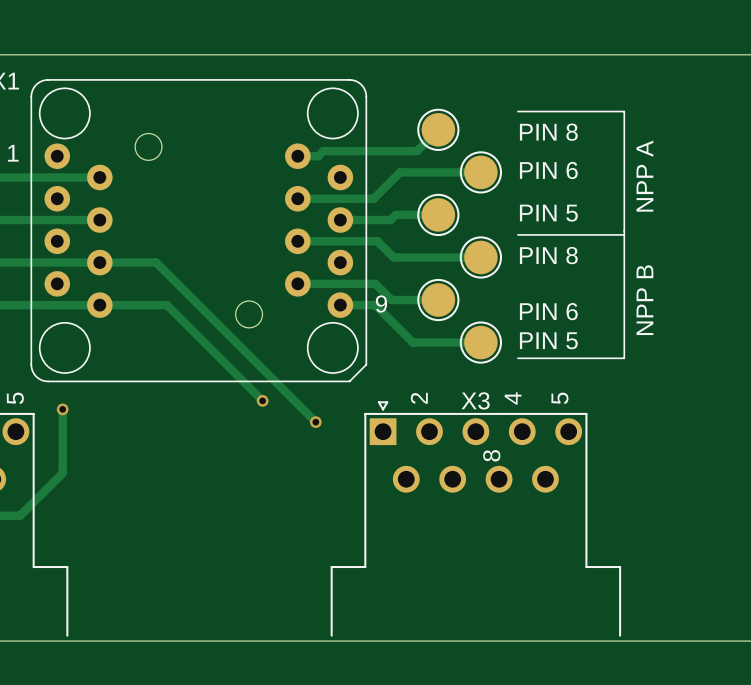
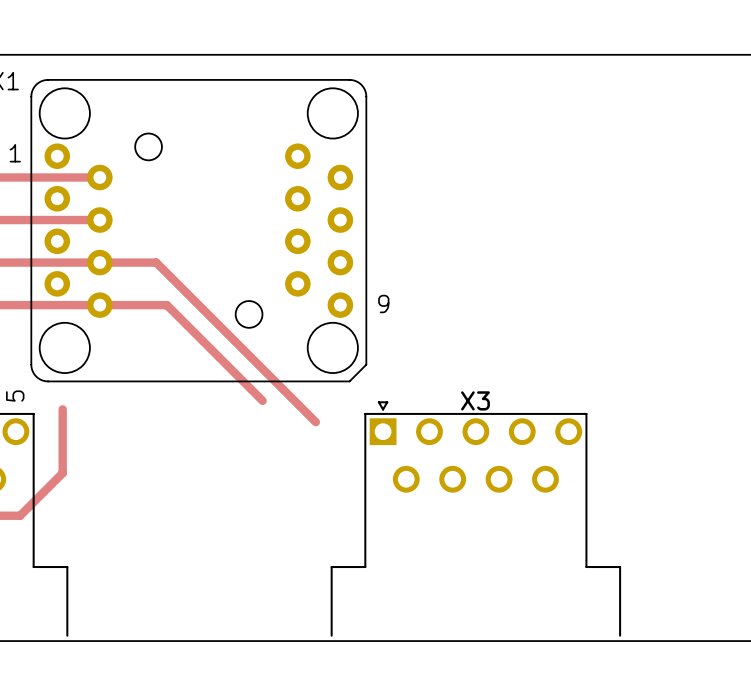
line: (517, 111) (624, 111) (624, 358) (517, 358) -> none
track: (438, 129) (417, 151) (323, 151) (318, 156) (297, 156) -> none
part: (438, 129) -> none
text: PIN 8 (548, 132) -> none
text: PIN 6 (548, 170) -> none
track: (480, 172) (400, 172) (373, 198) (297, 198) -> none
part: (480, 172) -> none
text: NPP A (644, 176) -> none
text: PIN 5 (548, 213) -> none
track: (438, 214) (395, 214) (390, 220) (340, 220) -> none
part: (438, 214) -> none
line: (517, 234) (624, 234) -> none
track: (297, 241) (377, 241) (393, 257) (480, 257) -> none
text: PIN 8 (548, 255) -> none
part: (480, 257) -> none
track: (297, 283) (375, 283) (391, 300) (438, 300) -> none
part: (438, 300) -> none
text: NPP B (644, 300) -> none
track: (340, 305) (375, 305) (412, 342) (480, 342) -> none
text: PIN 6 (548, 311) -> none
text: PIN 5 (548, 340) -> none
part: (480, 342) -> none
text: 2 (419, 398) -> none
text: 4 (513, 398) -> none
text: 5 (559, 398) -> none
via: (262, 400) -> none
via: (62, 409) -> none
via: (315, 422) -> none
text: 8 (491, 455) -> none

